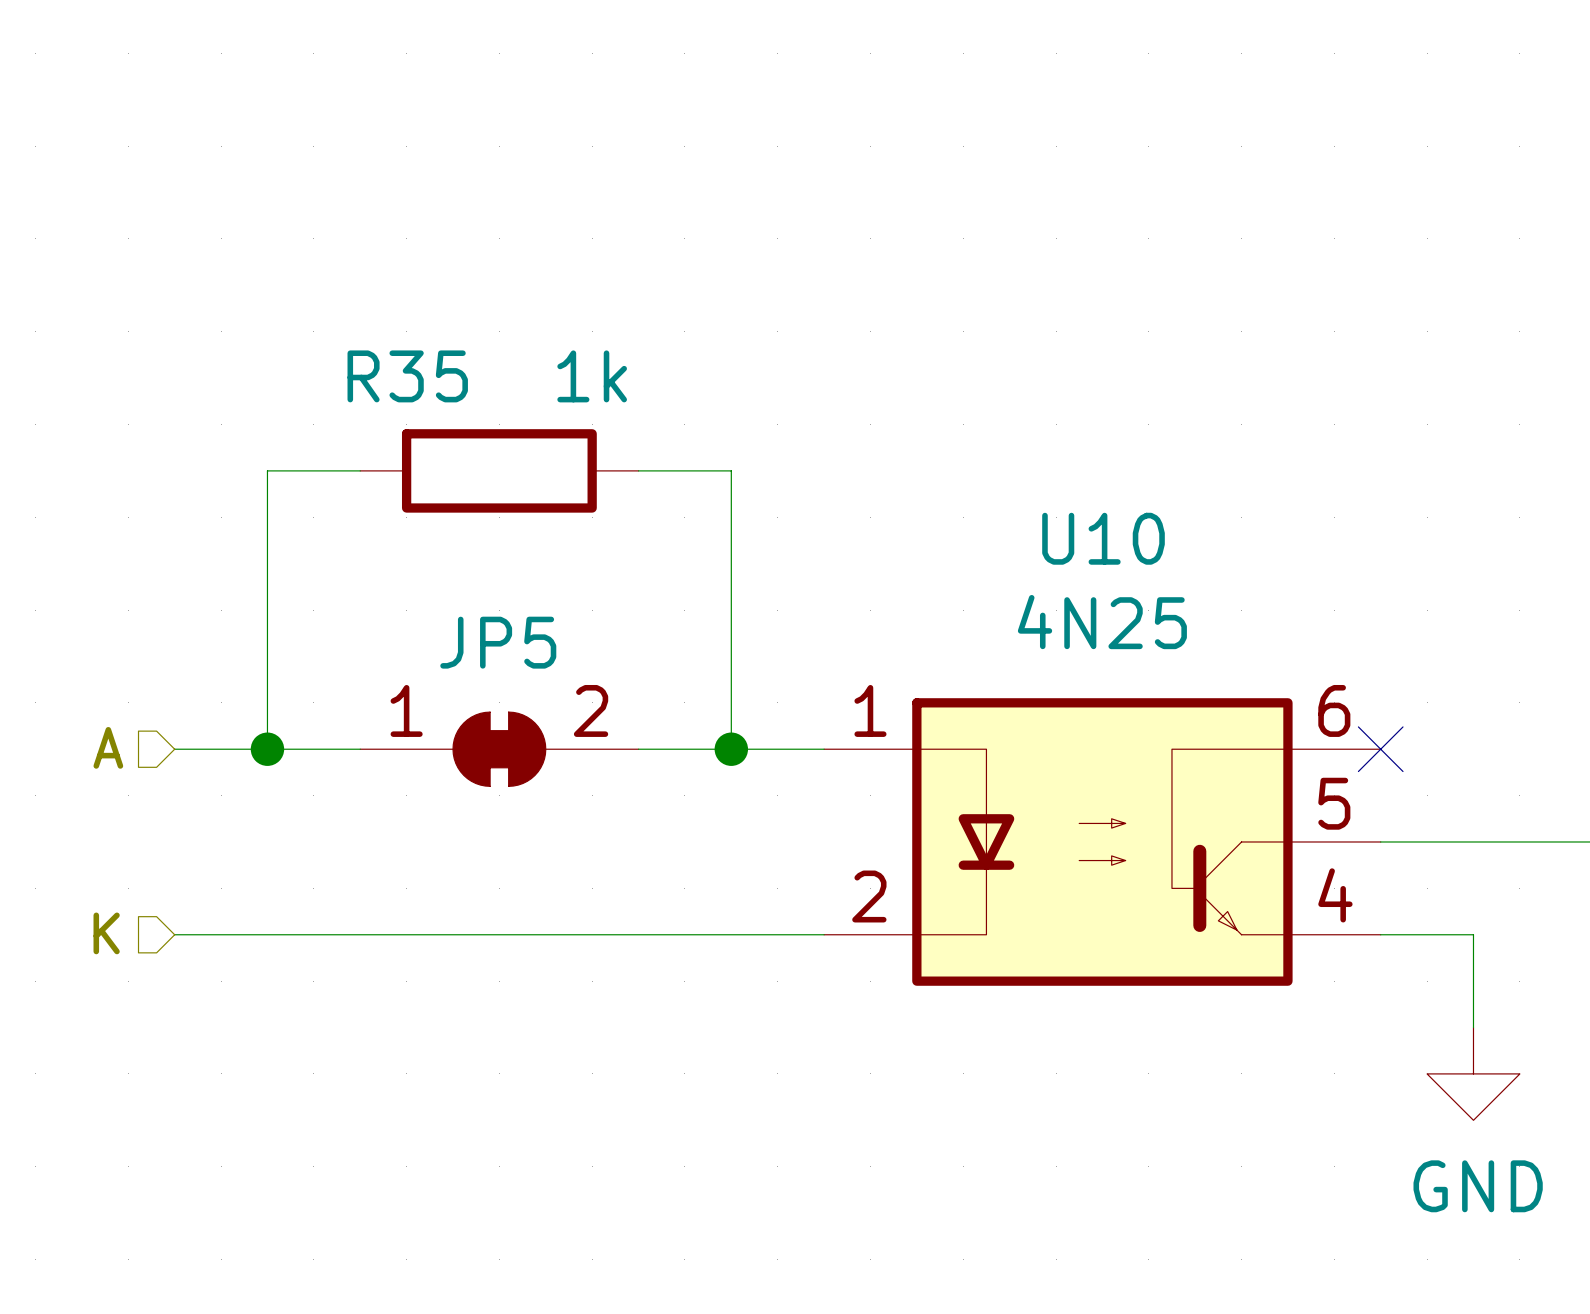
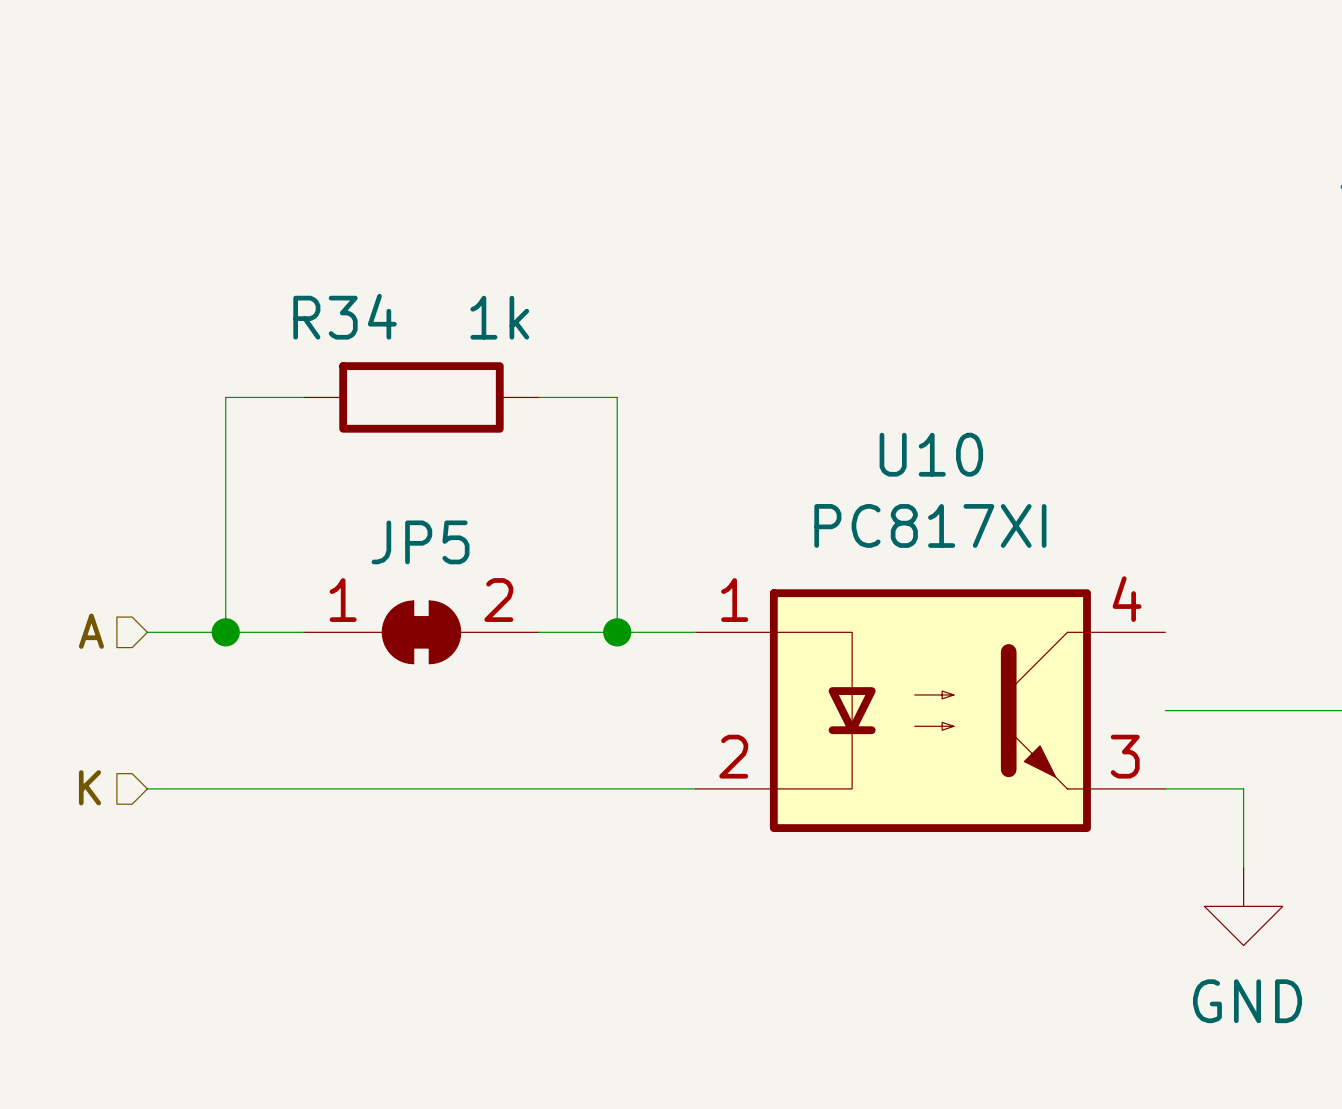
R35 name: R35 (407, 376) -> R34 (345, 316)
U10 value: 4N25 (1102, 622) -> PC817XI (930, 525)
U10 symbol: [824, 698, 1381, 986] -> [695, 589, 1166, 832]
no-connect mark: (1380, 749) -> none

